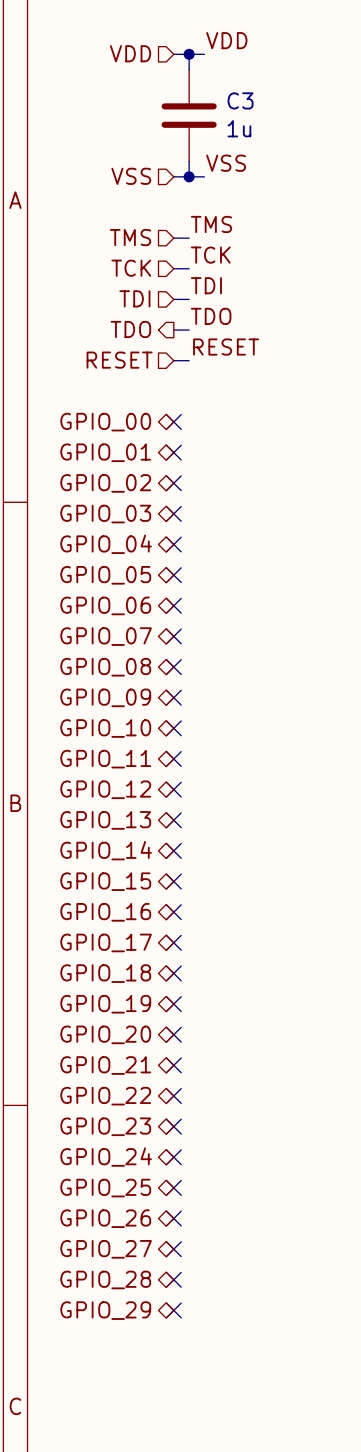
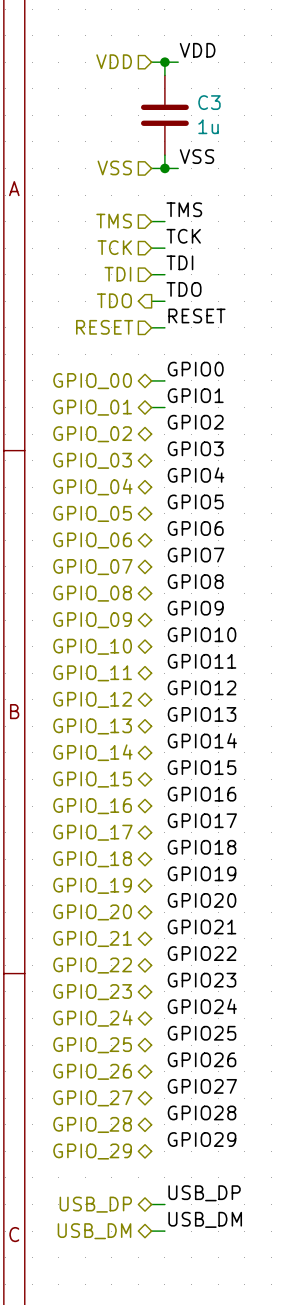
label: none -> GPIO0 (195, 369)
wire: none -> (151, 380) (164, 380)
no-connect mark: (173, 421) -> none
label: none -> GPIO1 (195, 395)
wire: none -> (151, 407) (164, 407)
no-connect mark: (173, 452) -> none
label: none -> GPIO2 (195, 422)
no-connect mark: (173, 483) -> none
label: none -> GPIO3 (195, 448)
no-connect mark: (173, 513) -> none
label: none -> GPIO4 (196, 475)
no-connect mark: (173, 544) -> none
label: none -> GPIO5 (195, 501)
no-connect mark: (173, 575) -> none
label: none -> GPIO6 (195, 528)
no-connect mark: (173, 605) -> none
label: none -> GPIO7 (196, 555)
no-connect mark: (173, 636) -> none
label: none -> GPIO8 (195, 581)
no-connect mark: (173, 667) -> none
label: none -> GPIO9 (195, 608)
no-connect mark: (173, 697) -> none
label: none -> GPIO10 (202, 634)
no-connect mark: (173, 728) -> none
label: none -> GPIO11 (202, 661)
no-connect mark: (173, 758) -> none
label: none -> GPIO12 (202, 687)
no-connect mark: (173, 789) -> none
label: none -> GPIO13 (202, 714)
no-connect mark: (173, 820) -> none
label: none -> GPIO14 (202, 740)
no-connect mark: (173, 850) -> none
label: none -> GPIO15 (202, 767)
no-connect mark: (173, 881) -> none
label: none -> GPIO16 (202, 794)
no-connect mark: (173, 912) -> none
label: none -> GPIO17 (202, 820)
no-connect mark: (173, 942) -> none
label: none -> GPIO18 (202, 847)
no-connect mark: (173, 973) -> none
label: none -> GPIO19 (202, 873)
no-connect mark: (173, 1004) -> none
label: none -> GPIO20 (202, 900)
no-connect mark: (173, 1034) -> none
label: none -> GPIO21 (202, 927)
no-connect mark: (173, 1065) -> none
label: none -> GPIO22 (202, 953)
no-connect mark: (173, 1095) -> none
label: none -> GPIO23 (202, 980)
no-connect mark: (173, 1126) -> none
label: none -> GPIO24 (202, 1006)
no-connect mark: (173, 1157) -> none
label: none -> GPIO25 (202, 1033)
no-connect mark: (173, 1187) -> none
label: none -> GPIO26 (202, 1059)
no-connect mark: (173, 1218) -> none
label: none -> GPIO27 (202, 1086)
no-connect mark: (173, 1249) -> none
label: none -> GPIO28 (202, 1112)
no-connect mark: (173, 1279) -> none
label: none -> GPIO29 (202, 1139)
no-connect mark: (173, 1310) -> none
label: none -> USB_DP (204, 1193)
hierarchical label: none -> USB_DP (95, 1204)
wire: none -> (151, 1204) (164, 1204)
label: none -> USB_DM (205, 1219)
hierarchical label: none -> USB_DM (94, 1231)
wire: none -> (151, 1231) (164, 1231)

